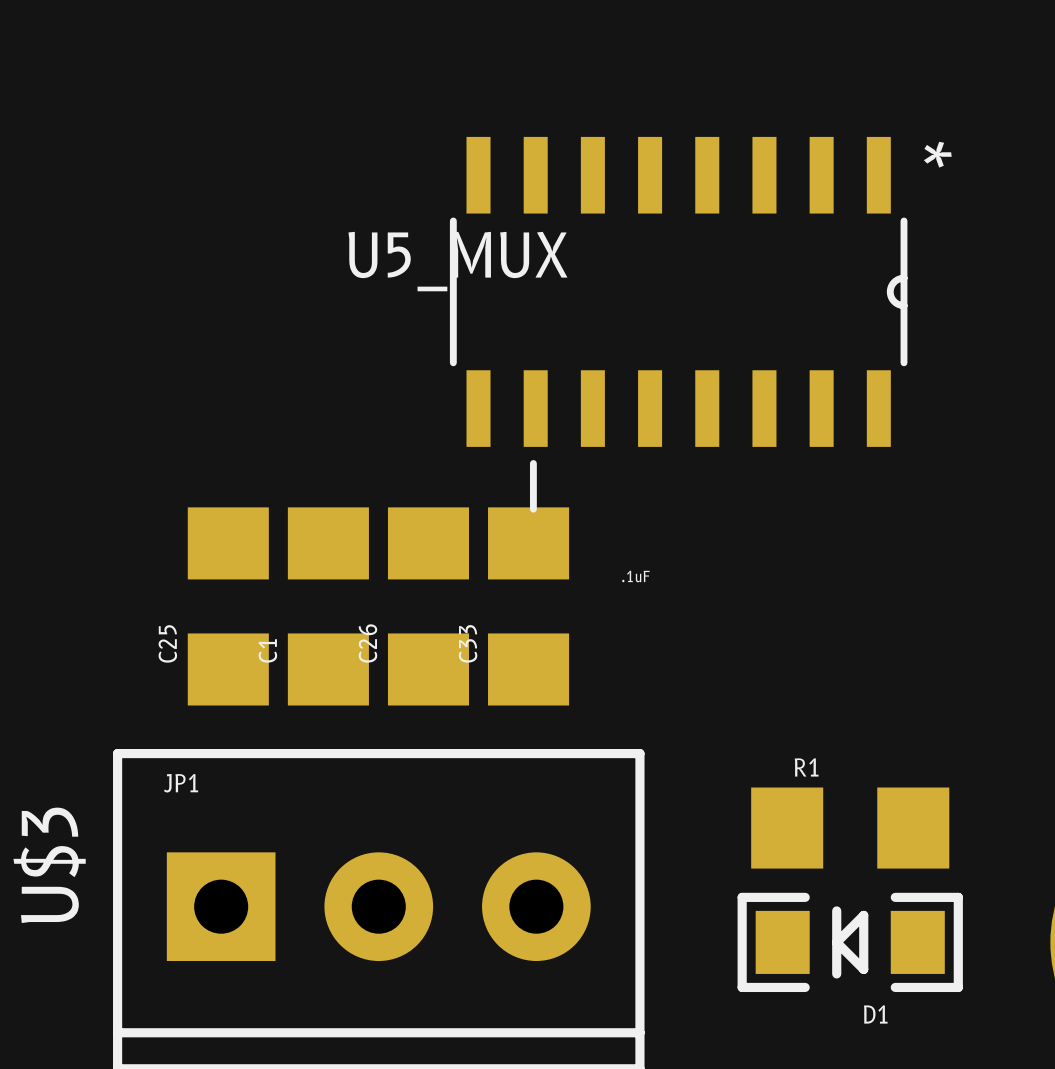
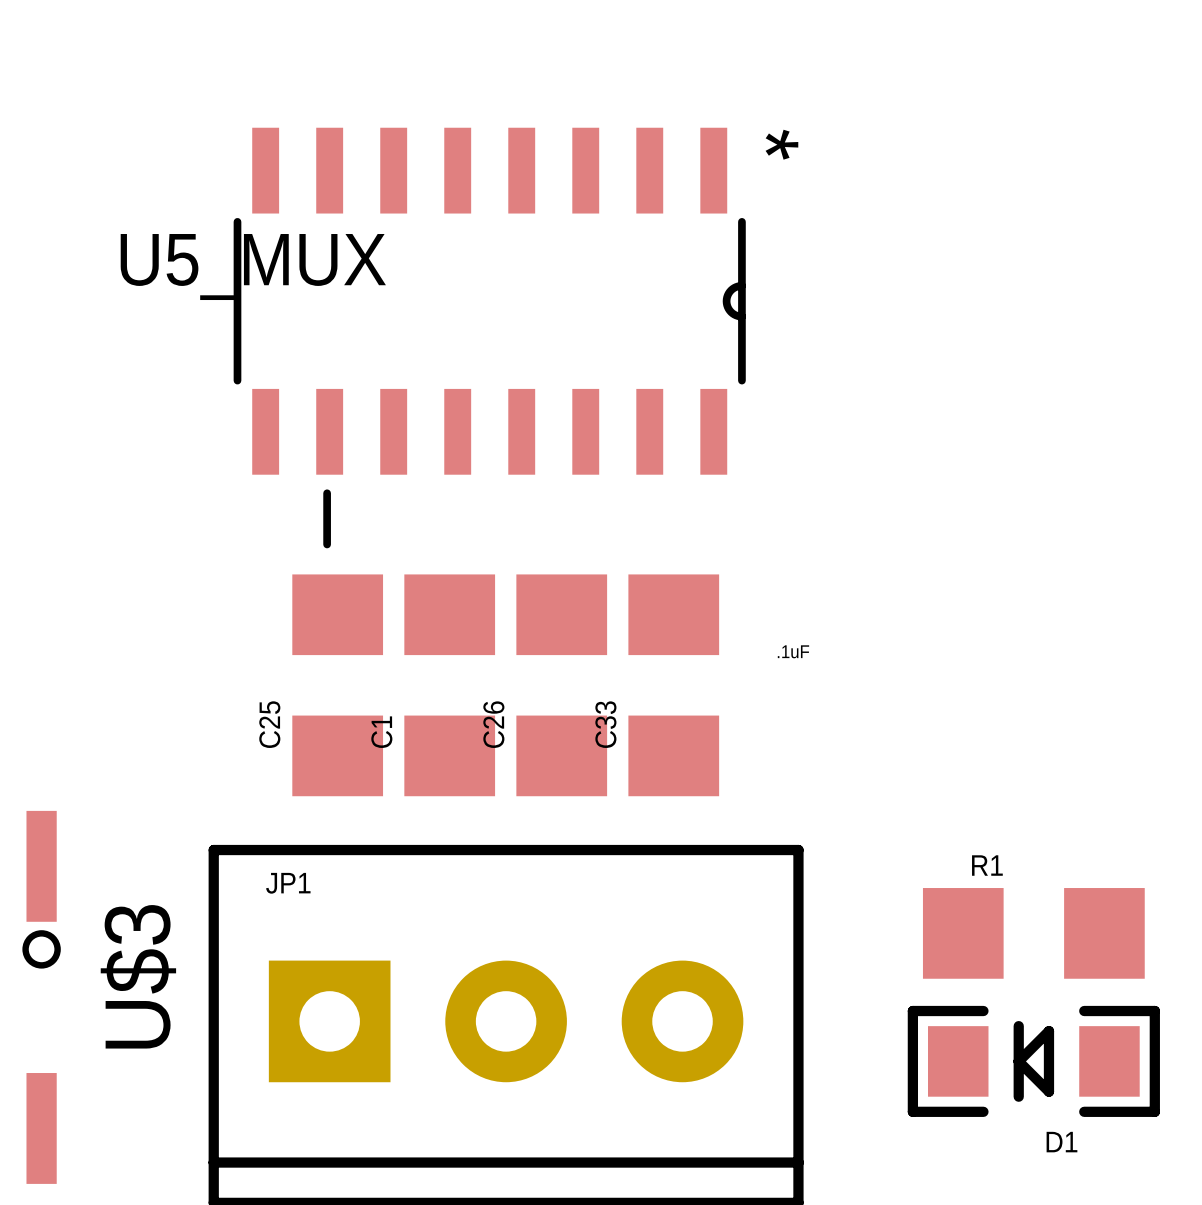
U5_MUX position: (678, 324) -> (489, 338)

